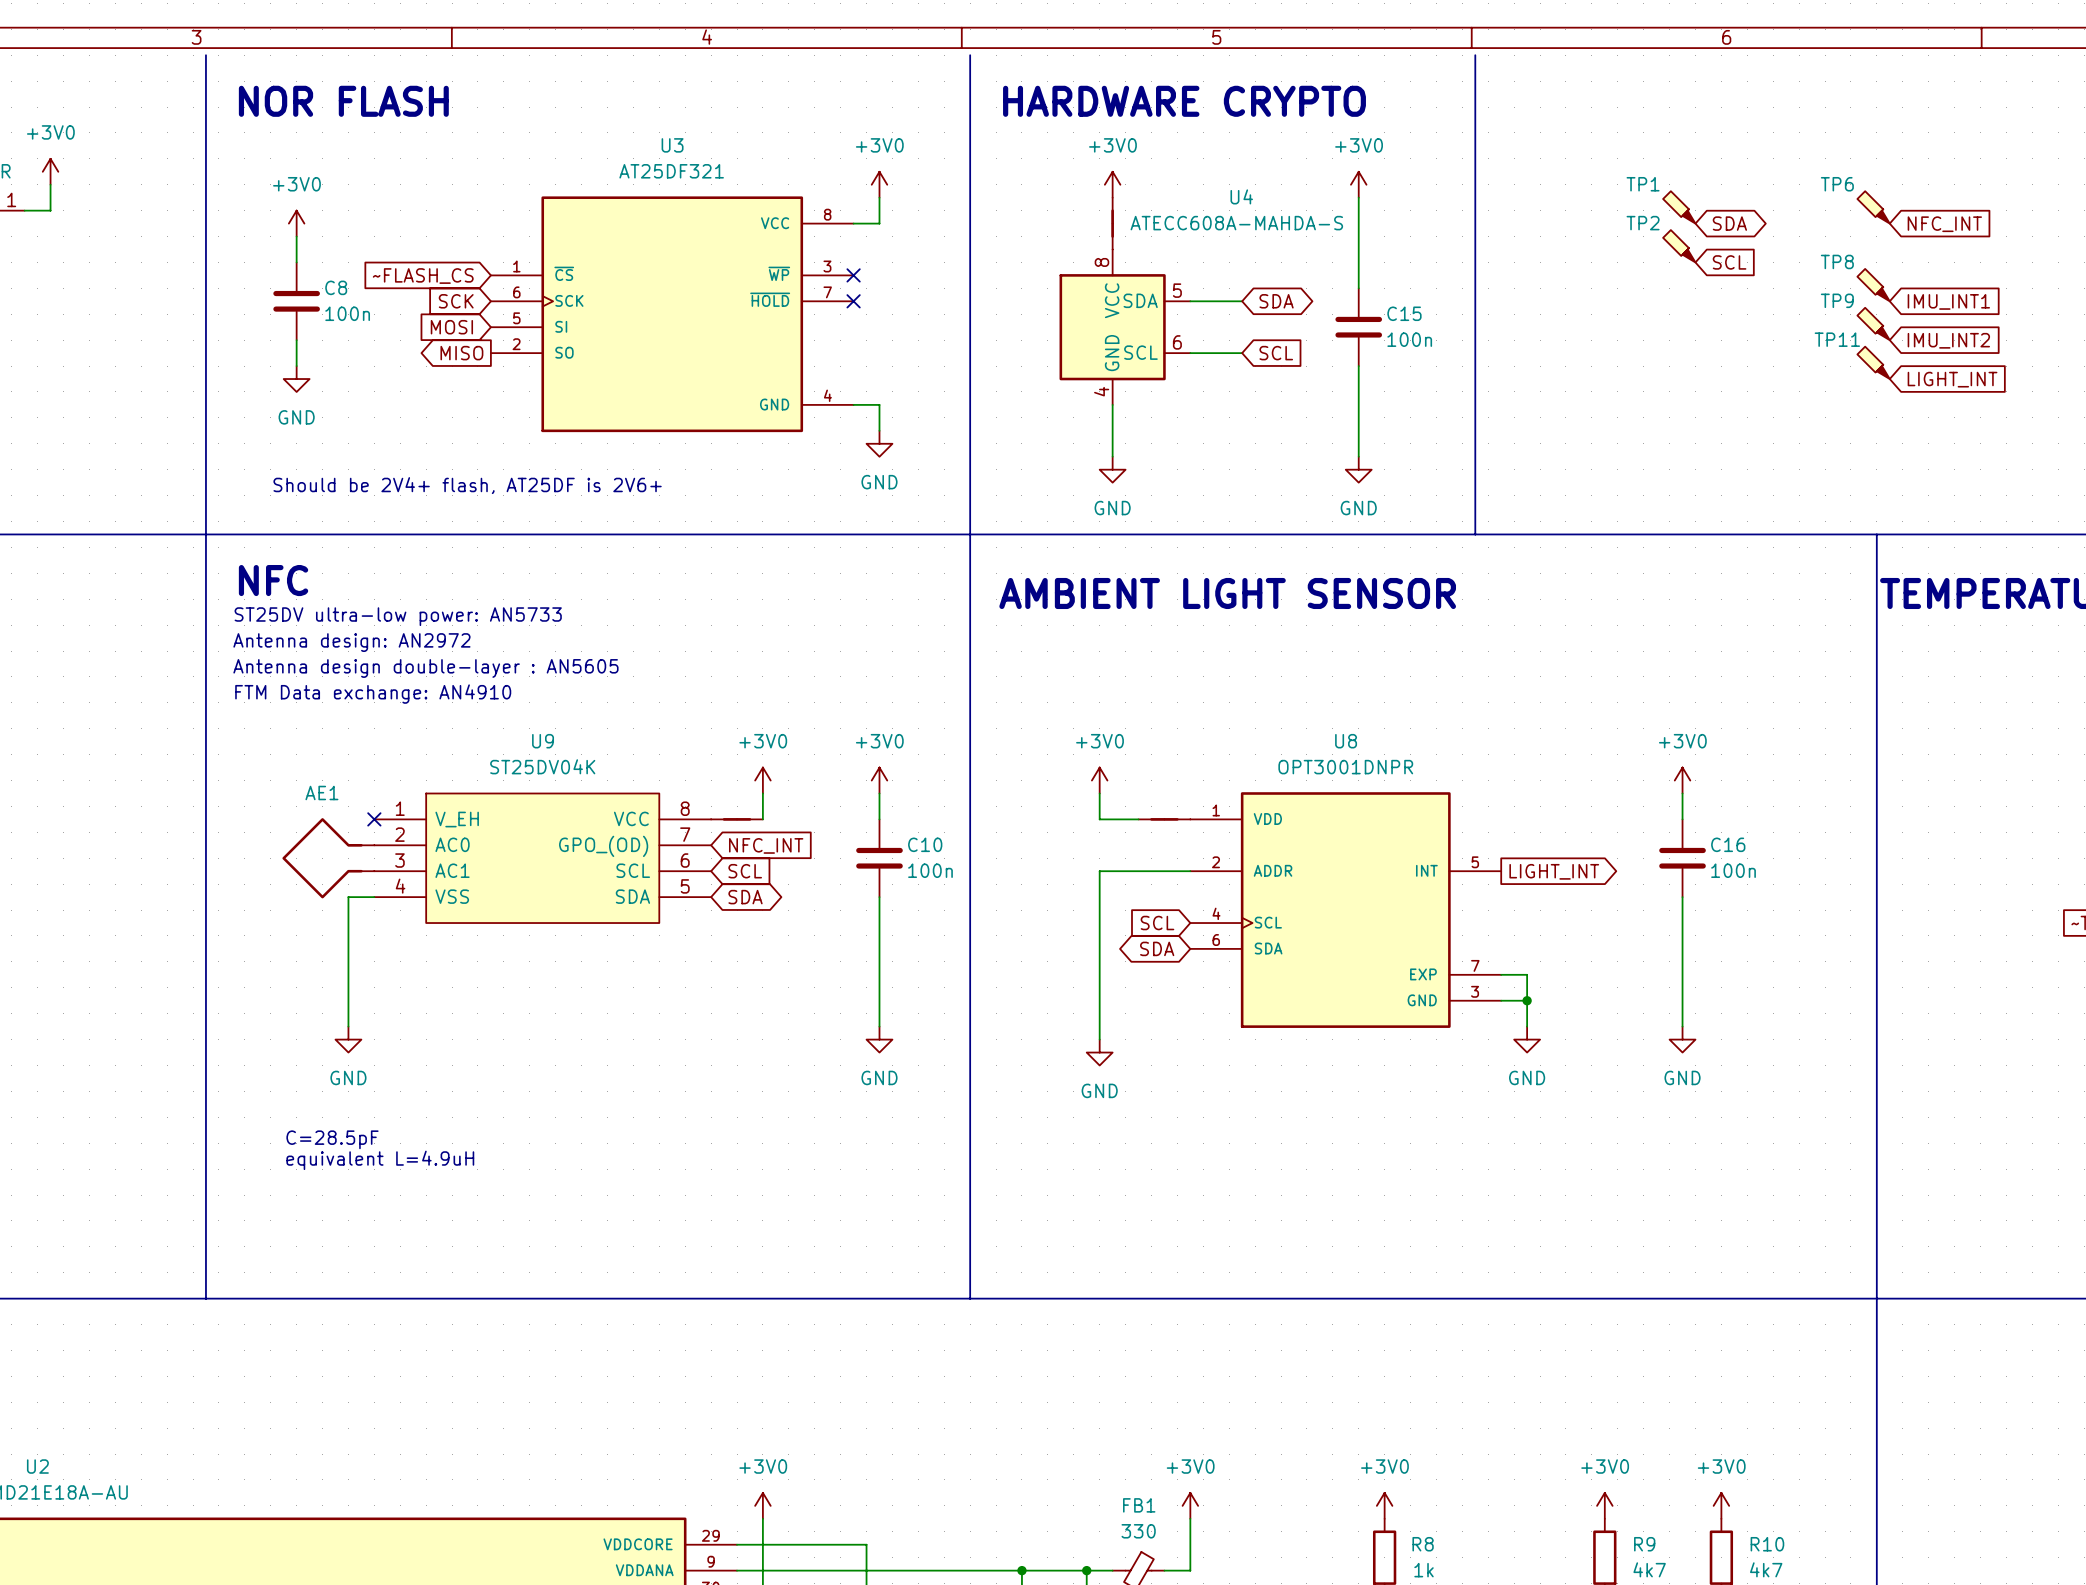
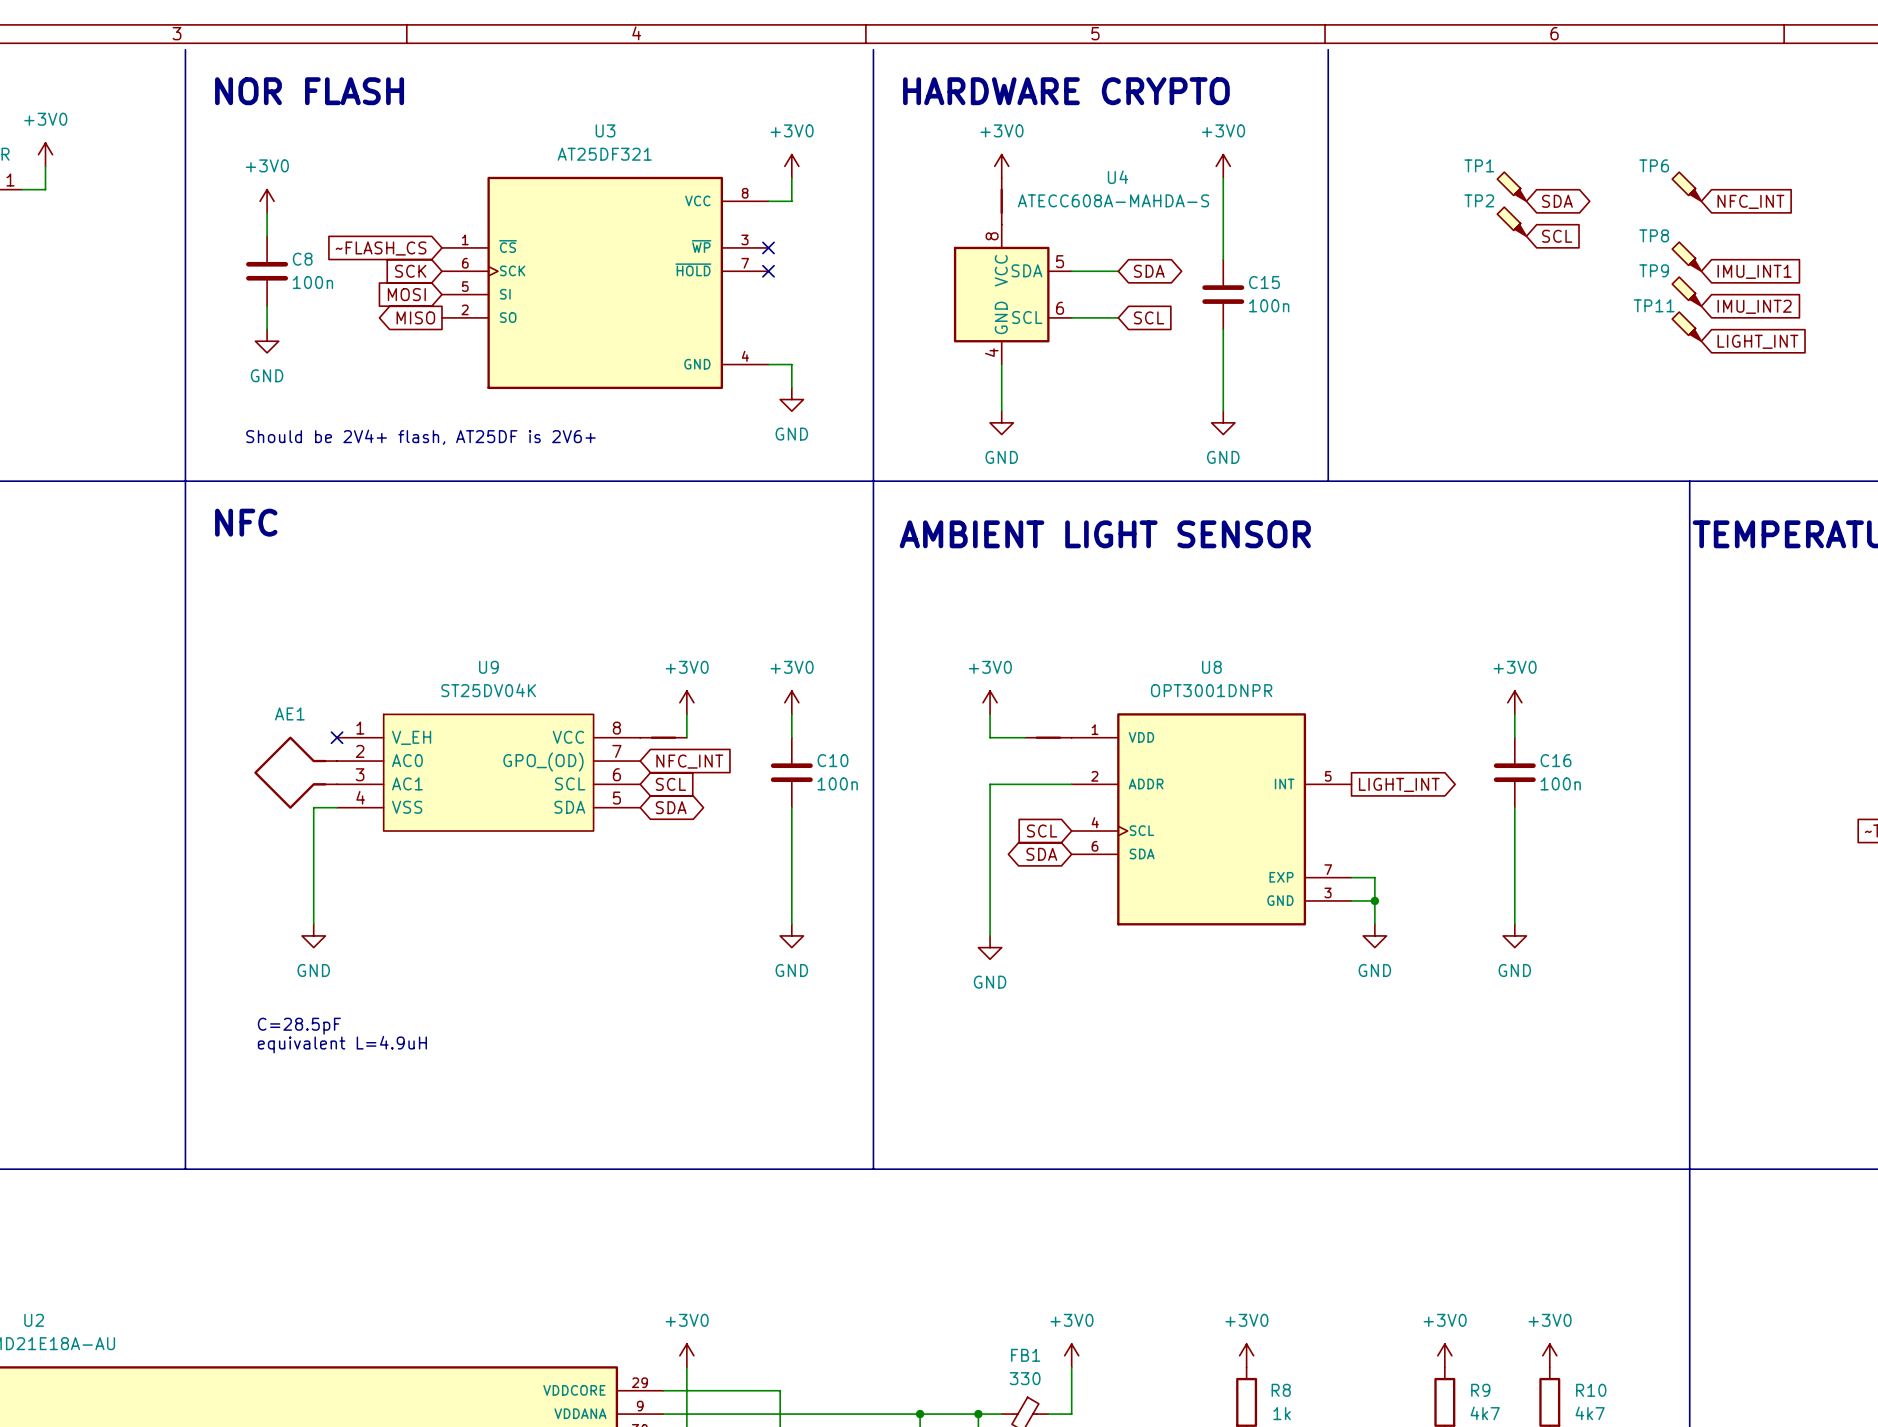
text: ST25DV ultra-low power: AN5733 (398, 616) -> none
text: Antenna design: AN2972 (351, 642) -> none
text: Antenna design double-layer : AN5605 (425, 668) -> none
text: FTM Data exchange: AN4910 (373, 694) -> none

